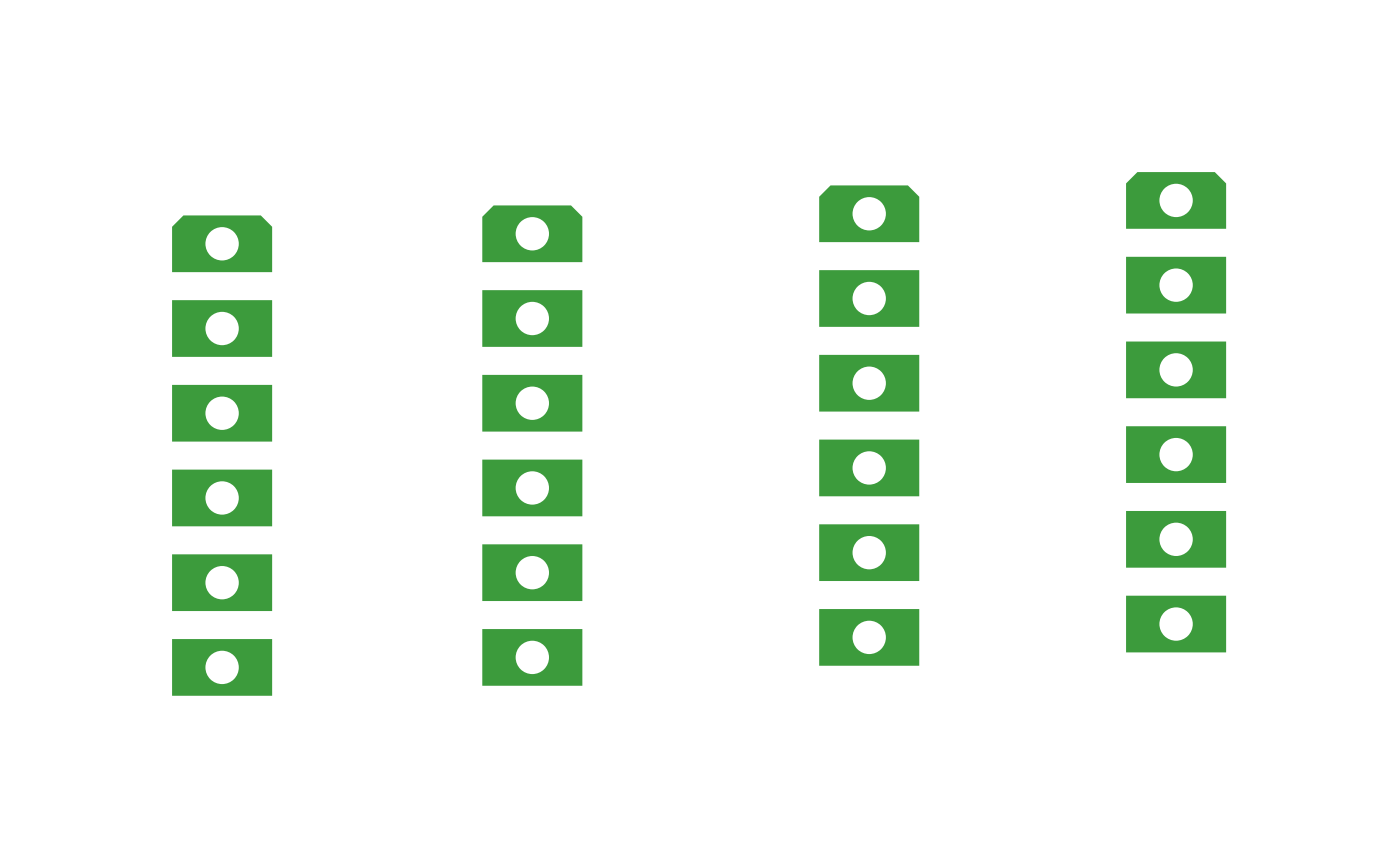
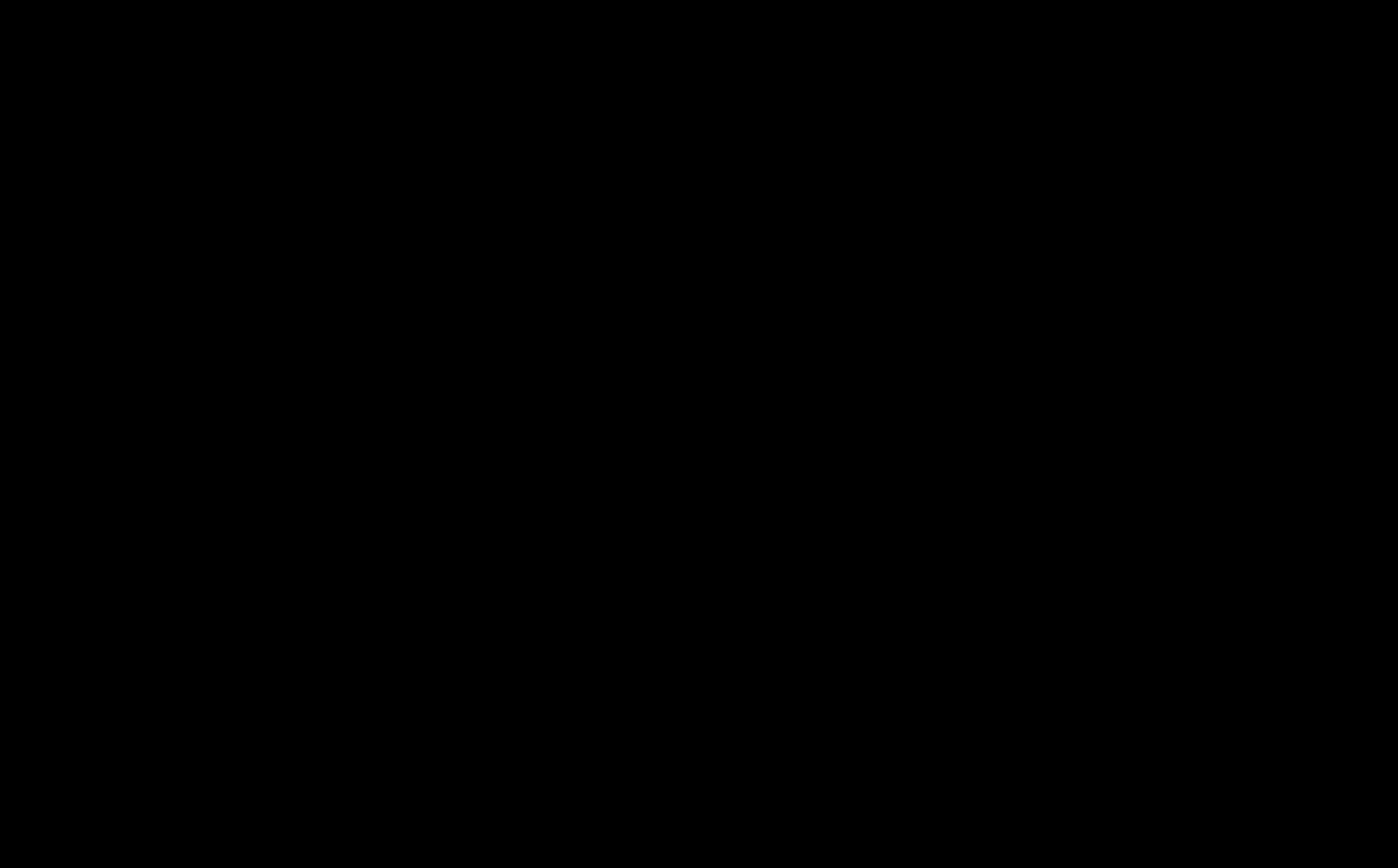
part: (1176, 412) -> none
part: (869, 425) -> none
part: (532, 445) -> none
part: (222, 455) -> none

